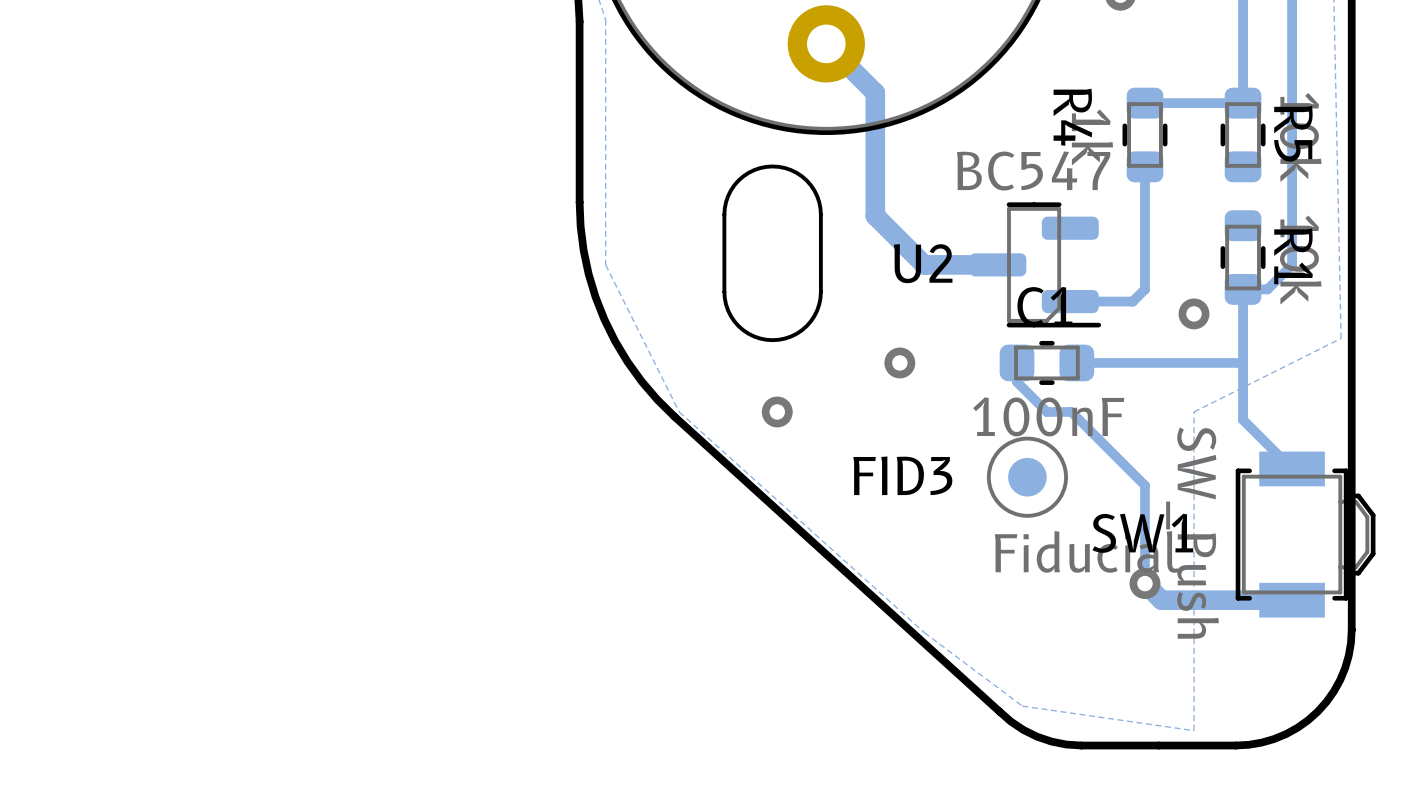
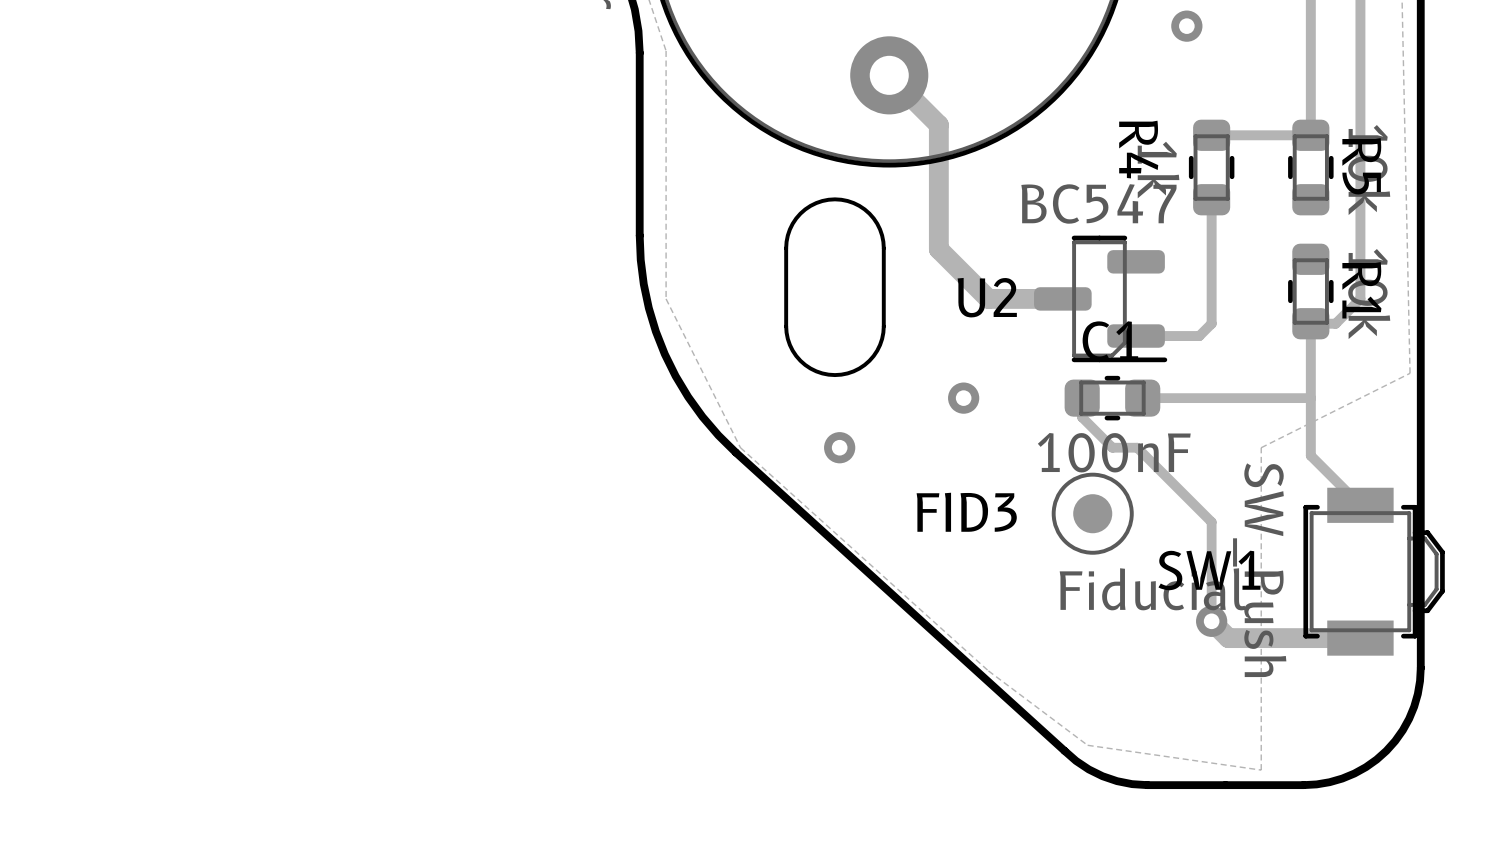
via: (1194, 313) -> none

